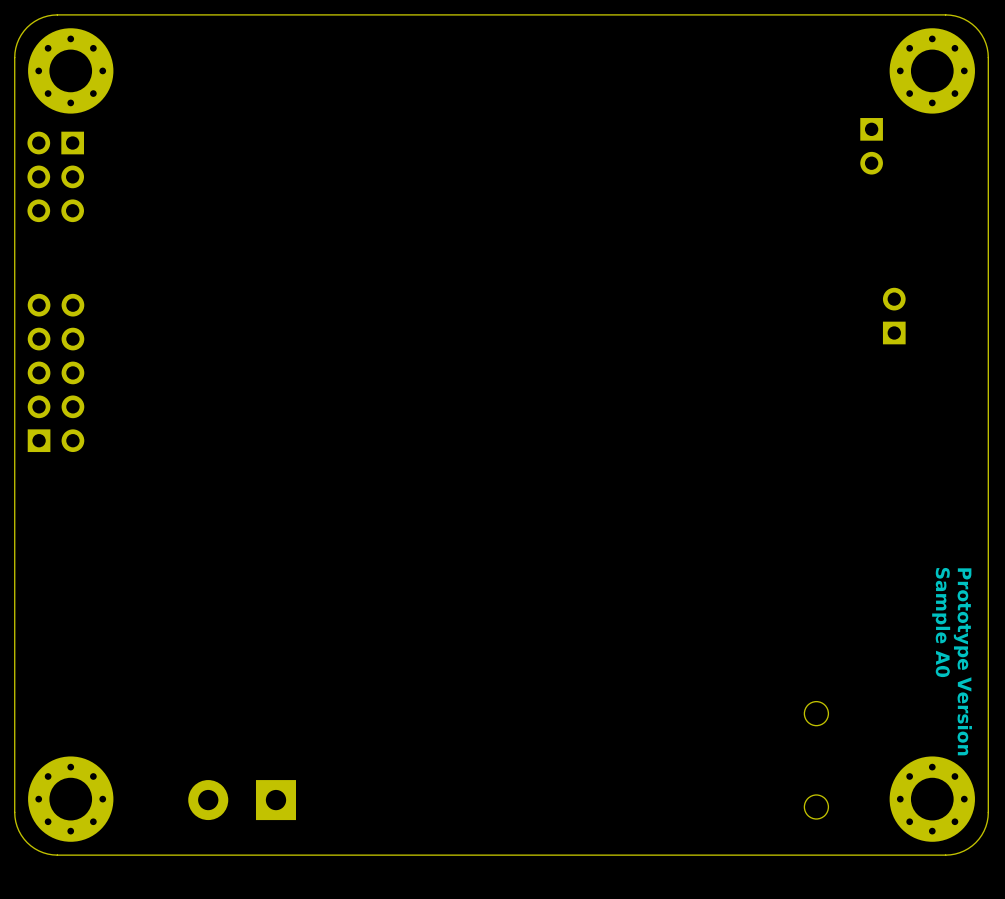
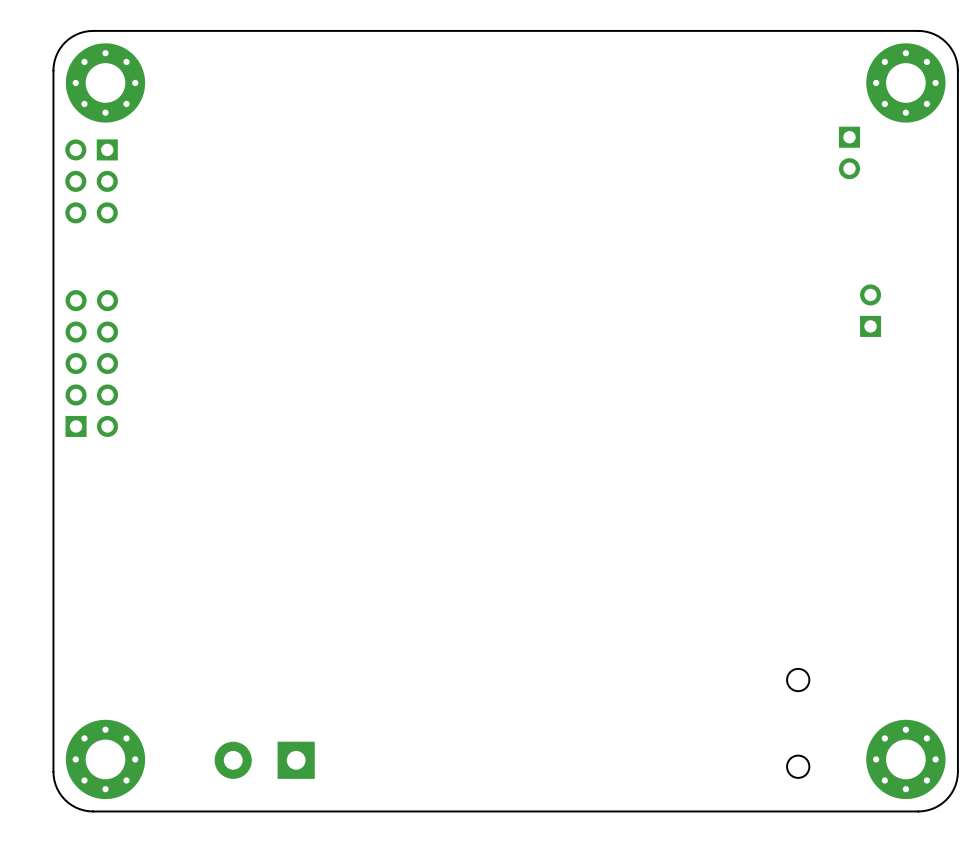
text: Sample A0 (941, 622) -> none
text: Prototype Version (962, 661) -> none

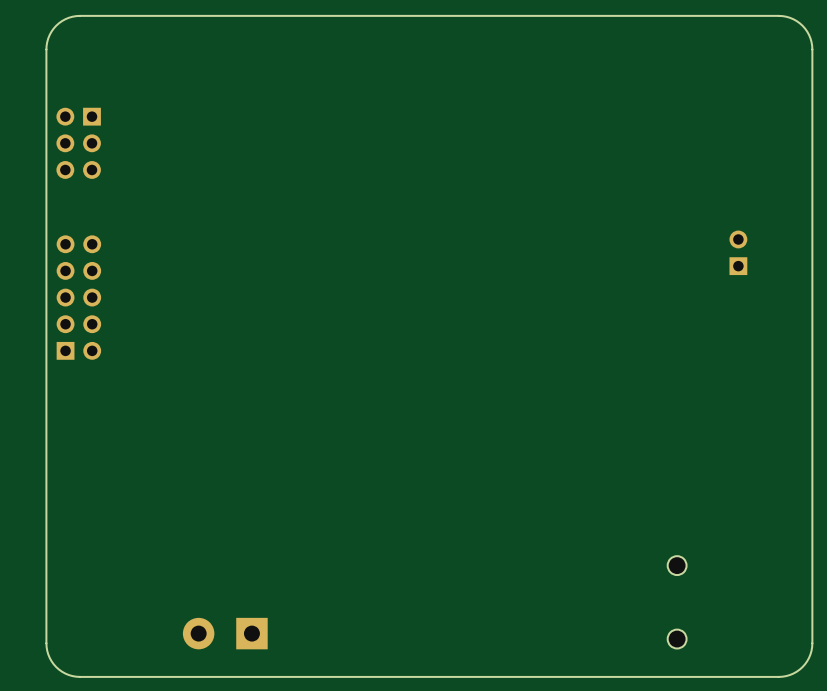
part: (105, 82) -> none
part: (905, 82) -> none
part: (849, 152) -> none
part: (105, 759) -> none
part: (905, 759) -> none

